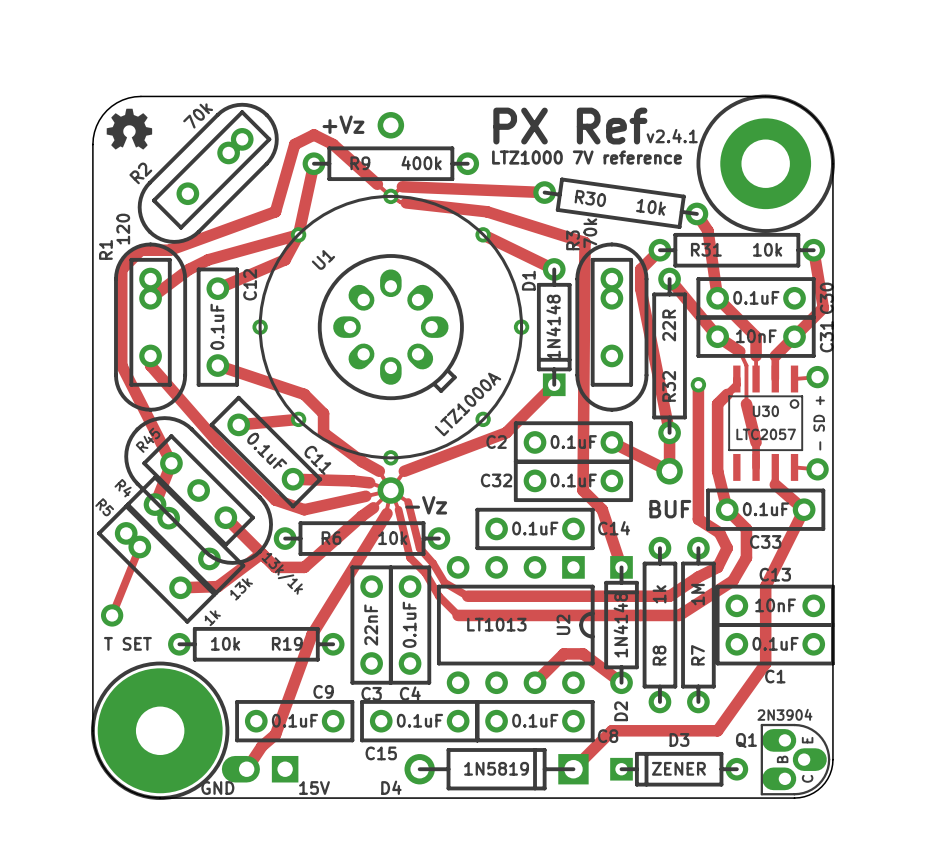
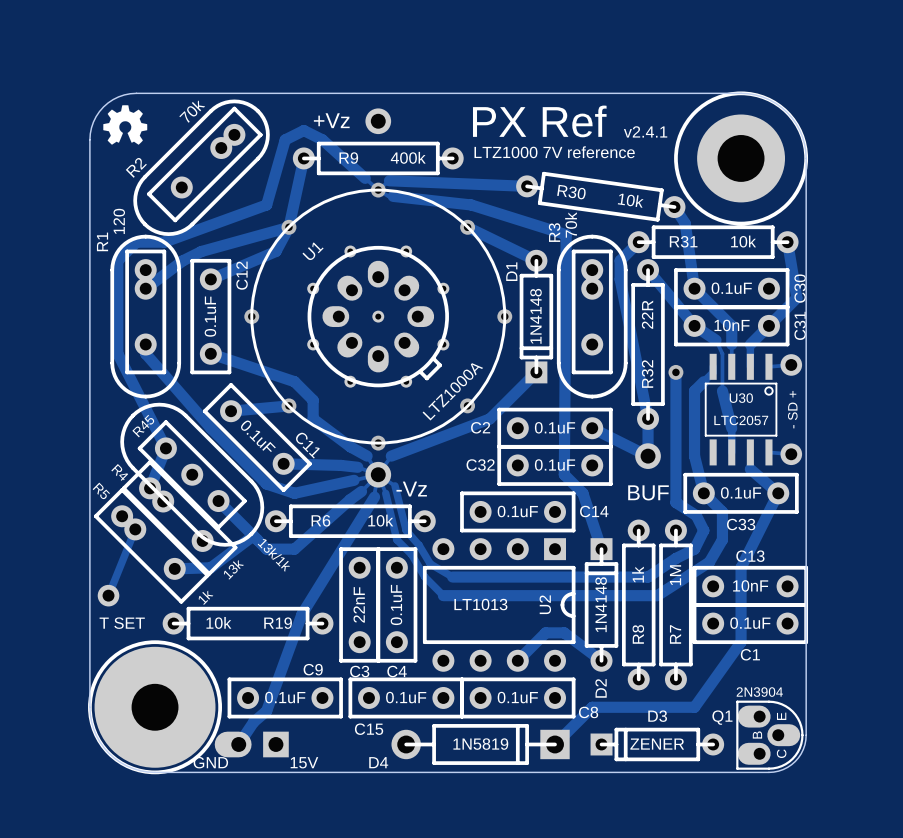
part: none -> (350, 251)
part: none -> (406, 251)
part: none -> (313, 288)
part: none -> (443, 288)
part: none -> (378, 316)
part: none -> (313, 344)
part: none -> (443, 344)
part: none -> (350, 381)
part: none -> (406, 381)

